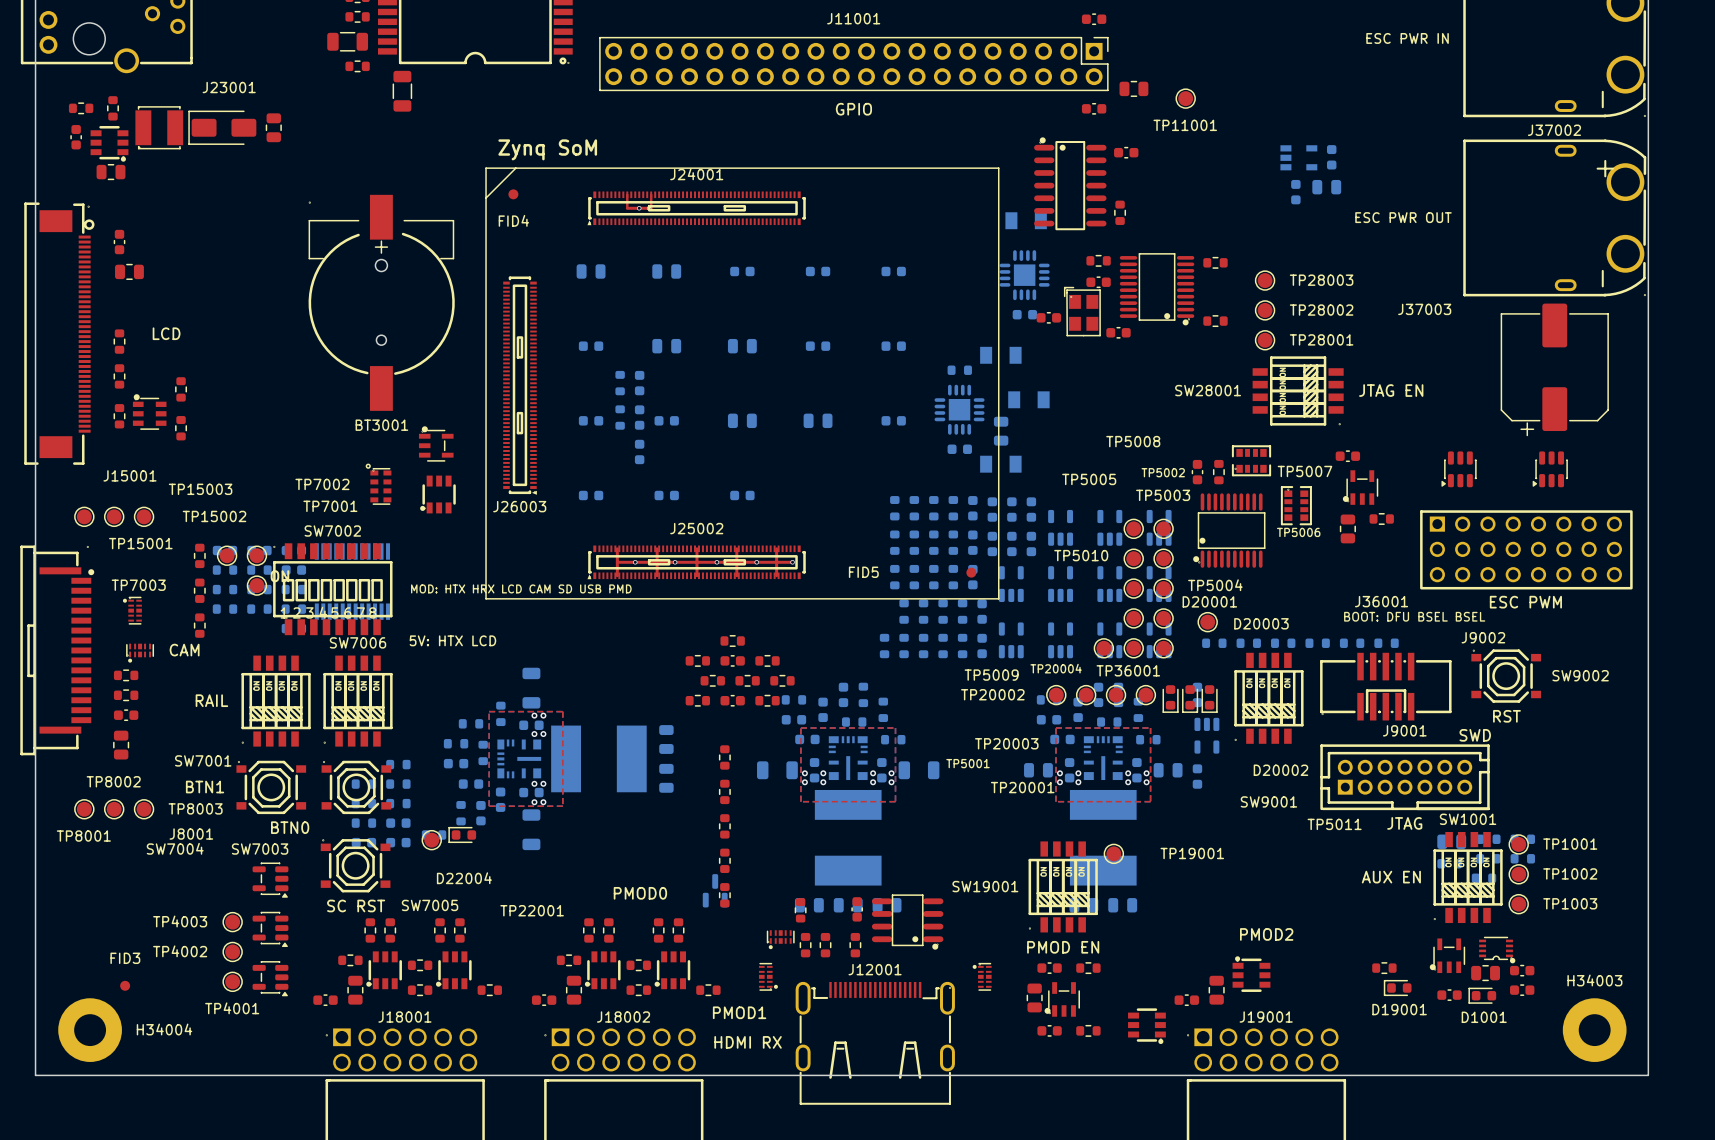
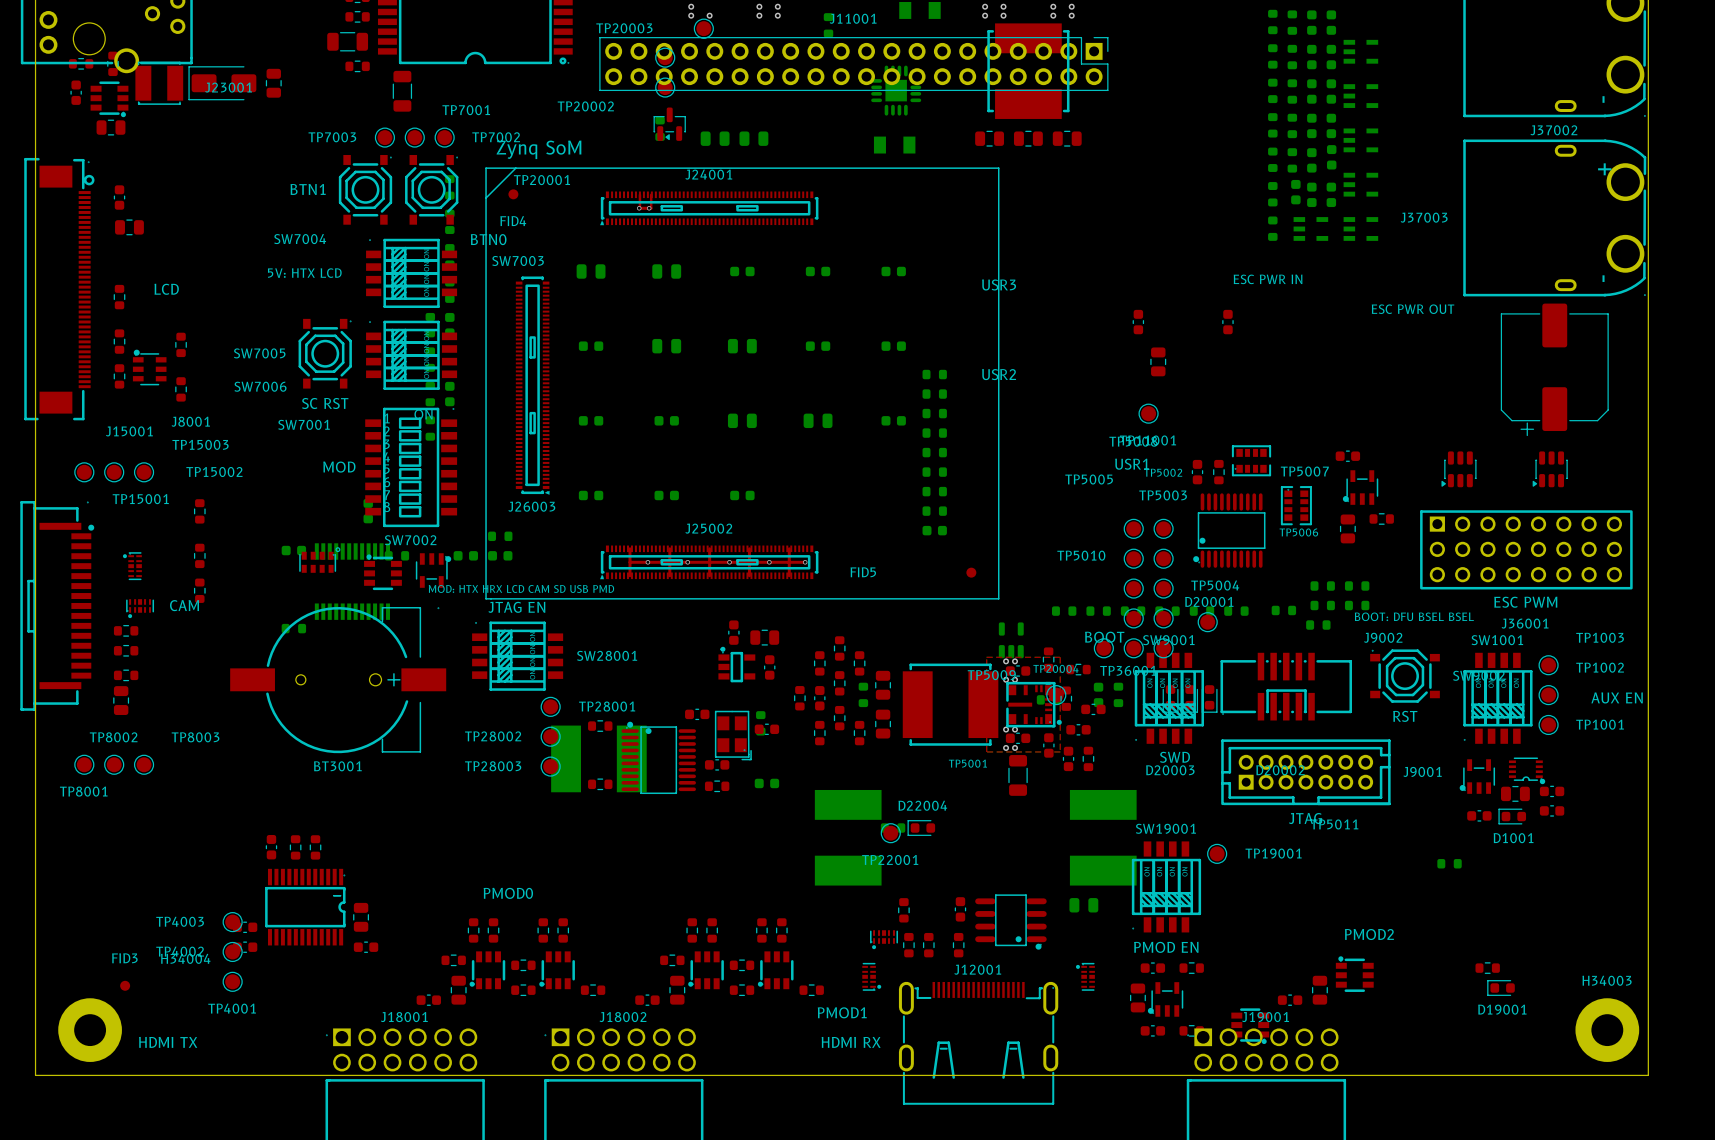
via: none -> (691, 6)
via: none -> (759, 6)
via: none -> (777, 6)
via: none -> (985, 6)
via: none -> (1003, 6)
via: none -> (1053, 6)
via: none -> (1071, 6)
part: none -> (919, 10)
via: none -> (691, 15)
via: none -> (709, 15)
via: none -> (759, 15)
via: none -> (777, 15)
via: none -> (985, 15)
via: none -> (1003, 15)
via: none -> (1053, 15)
via: none -> (1071, 15)
part: (1094, 19) -> none
part: none -> (1272, 22)
part: none -> (1292, 22)
part: none -> (1311, 22)
part: none -> (1331, 22)
part: none -> (828, 25)
text: ESC PWR IN (1407, 38) -> none
part: none -> (1360, 51)
part: none -> (1272, 56)
part: none -> (1292, 57)
part: none -> (1311, 57)
part: none -> (1331, 57)
part: none -> (81, 63)
part: none -> (112, 63)
part: none -> (1028, 71)
part: (1133, 88) -> none
part: none -> (896, 90)
part: none -> (1272, 90)
part: none -> (1292, 91)
part: none -> (1311, 91)
part: none -> (1331, 91)
part: none -> (76, 92)
part: none -> (1360, 96)
TP11001 position: (1185, 98) -> (1148, 413)
part: (81, 108) -> none
part: (112, 108) -> none
part: (1094, 108) -> none
text: GPIO (853, 109) -> none
part: none -> (669, 124)
part: none -> (1272, 125)
part: none -> (1292, 125)
part: none -> (1311, 125)
part: none -> (1331, 125)
part: none -> (110, 127)
part position: (159, 127) -> (159, 83)
part position: (222, 127) -> (222, 83)
part position: (273, 127) -> (273, 83)
part: none -> (660, 128)
part: (76, 137) -> none
part: none -> (715, 138)
part: none -> (753, 138)
part: none -> (989, 138)
part: none -> (1028, 138)
part: none -> (1067, 138)
part: none -> (1360, 140)
part position: (109, 143) -> (109, 99)
part: none -> (894, 145)
part: (1126, 152) -> none
part: (1298, 157) -> none
part: none -> (1272, 159)
part: none -> (1292, 160)
part: none -> (1311, 160)
part: (110, 172) -> none
part: (1070, 183) -> none
part: none -> (1360, 184)
part: none -> (449, 187)
part: (1326, 187) -> none
text: none -> BTN1 (308, 189)
top track: (627, 194) (627, 208) (639, 208) -> (639, 194) (639, 208)
part: none -> (1272, 194)
part: none -> (1311, 194)
part: none -> (1331, 194)
part: none -> (119, 197)
J24001 position: (696, 208) -> (709, 208)
part: (1120, 212) -> none
text position: ESC PWR OUT (1403, 217) -> ESC PWR OUT (1413, 309)
part: (1026, 220) -> none
part: none -> (449, 221)
part: none -> (129, 227)
part: none -> (1272, 228)
part: none -> (1310, 228)
part: none -> (1360, 228)
text: none -> BTN0 (488, 239)
part: (119, 242) -> none
part: none -> (449, 256)
part: (1098, 260) -> none
part: (1215, 262) -> none
part: (129, 271) -> none
text: none -> 5V: HTX LCD (304, 273)
part: (1024, 275) -> none
text: none -> ESC PWR IN (1268, 279)
TP28003 position: (1265, 280) -> (550, 766)
TP28003 name position: TP28003 (1321, 280) -> TP28003 (493, 766)
part: (1098, 282) -> none
text: none -> USR3 (999, 284)
part: (1157, 289) -> none
part: none -> (449, 290)
part: none -> (119, 297)
BT3001 rotation: 0° (381, 302) -> 90° clockwise (338, 680)
BT3001 position: (381, 302) -> (338, 680)
J37003 name position: J37003 (1424, 309) -> J37003 (1424, 217)
TP28002 position: (1265, 310) -> (550, 736)
TP28002 name position: TP28002 (1321, 310) -> TP28002 (493, 736)
part: (1082, 311) -> none
part: (1024, 314) -> none
part: (1048, 317) -> none
part: (1215, 321) -> none
part: none -> (1227, 322)
part: none -> (430, 325)
part: none -> (449, 325)
part rotation: 0° (1118, 332) -> 90° clockwise (1138, 322)
part position: (1118, 332) -> (1138, 322)
J15001 position: (59, 333) -> (59, 289)
text position: LCD (166, 333) -> LCD (166, 289)
TP28001 position: (1265, 340) -> (550, 706)
part: none -> (181, 344)
part: (1000, 355) -> none
part: none -> (430, 359)
part: none -> (1158, 361)
part: (959, 370) -> none
part: none -> (934, 374)
text: none -> USR2 (999, 374)
part: (620, 383) -> none
part: (639, 383) -> none
J26003 position: (520, 385) -> (532, 385)
SW28001 rotation: 0° (1298, 390) -> 180° (517, 656)
SW28001 position: (1298, 390) -> (517, 656)
text: JTAG EN (1391, 390) -> none
part: none -> (430, 394)
part: none -> (449, 394)
part: none -> (934, 394)
part: (1028, 399) -> none
text: none -> SC RST (325, 403)
part: (959, 409) -> none
part position: (149, 412) -> (149, 367)
part: none -> (934, 413)
part: (119, 416) -> none
part: (620, 417) -> none
part: (639, 417) -> none
BT3001 name position: BT3001 (381, 425) -> BT3001 (337, 766)
part: (181, 428) -> none
part: none -> (430, 428)
part: (1001, 431) -> none
part: none -> (934, 433)
part rotation: 0° (436, 443) -> 90° clockwise (433, 570)
part position: (436, 443) -> (433, 570)
part: (959, 449) -> none
part: (639, 451) -> none
part: none -> (934, 452)
part: (1000, 464) -> none
text: none -> USR1 (1132, 464)
text: none -> MOD (339, 467)
part: none -> (934, 472)
TP7002 name position: TP7002 (322, 484) -> TP7002 (496, 137)
part rotation: 0° (378, 484) -> 90° clockwise (319, 560)
part position: (378, 484) -> (319, 560)
part: none -> (934, 491)
part rotation: 0° (437, 494) -> 90° clockwise (382, 572)
part position: (437, 494) -> (382, 572)
TP7001 name position: TP7001 (330, 506) -> TP7001 (466, 110)
part: (894, 508) -> none
part: (914, 508) -> none
part rotation: 0° (933, 508) -> 90° clockwise (934, 511)
part: (953, 508) -> none
part: (972, 508) -> none
part: (992, 509) -> none
part: (1011, 509) -> none
part: (1031, 509) -> none
part: none -> (199, 511)
part: none -> (368, 511)
TP15001 position: (84, 516) -> (84, 472)
TP15002 position: (114, 516) -> (114, 472)
TP15003 position: (144, 516) -> (144, 472)
part: (1060, 527) -> none
part: (1109, 527) -> none
part: (1159, 527) -> none
part: none -> (934, 530)
SW7002 name position: SW7002 (332, 531) -> SW7002 (410, 540)
part: none -> (500, 536)
part: (894, 542) -> none
part: (914, 542) -> none
part: (933, 542) -> none
part: (953, 542) -> none
part: (972, 542) -> none
part: (992, 543) -> none
part: (1011, 543) -> none
part: (1031, 543) -> none
top track: (617, 548) (617, 575) -> (629, 548) (629, 575)
top track: (657, 548) (657, 575) -> (669, 548) (669, 575)
top track: (696, 548) (696, 575) -> (709, 548) (709, 575)
top track: (736, 548) (736, 575) -> (749, 548) (749, 575)
top track: (776, 548) (776, 575) -> (789, 548) (789, 575)
part: (224, 550) -> none
part: (259, 550) -> none
TP7002 position: (227, 555) -> (444, 137)
TP7001 position: (256, 555) -> (414, 137)
part: none -> (396, 555)
part: none -> (465, 555)
part: none -> (500, 555)
top track: (617, 562) (629, 562) -> (792, 562) (805, 562)
via position: (635, 562) -> (647, 562)
via position: (675, 562) -> (687, 562)
J25002 position: (696, 562) -> (709, 562)
via position: (716, 562) -> (729, 562)
via: (756, 562) -> none
via: none -> (769, 562)
via: (792, 562) -> none
via: none -> (805, 562)
part: (224, 570) -> none
part: (259, 570) -> none
part: (293, 570) -> none
part: (894, 577) -> none
part: (914, 577) -> none
part: (933, 577) -> none
part: (953, 577) -> none
part: (972, 577) -> none
part: (1011, 584) -> none
part: (1060, 584) -> none
part: (1109, 584) -> none
part: (1159, 584) -> none
TP7003 name position: TP7003 (138, 585) -> TP7003 (332, 137)
TP7003 position: (256, 585) -> (384, 137)
part: none -> (1322, 585)
part: none -> (1357, 585)
part: (224, 589) -> none
part: (259, 589) -> none
part: (293, 589) -> none
SW7002 rotation: 0° (332, 589) -> 90° clockwise (411, 467)
SW7002 position: (332, 589) -> (411, 467)
J36001 name position: J36001 (1381, 601) -> J36001 (1525, 623)
part: none -> (1322, 605)
part: none -> (1357, 605)
text: none -> JTAG EN (516, 607)
part: (224, 609) -> none
part: (259, 609) -> none
part: (293, 609) -> none
part rotation: 0° (132, 610) -> 90° counterclockwise (140, 608)
part: none -> (1283, 610)
part: (904, 611) -> none
part: (923, 611) -> none
part: (943, 611) -> none
part: (962, 611) -> none
part: (982, 611) -> none
part: none -> (1064, 611)
part: none -> (1098, 611)
part: none -> (1133, 611)
part: none -> (1167, 611)
part: none -> (1201, 611)
part: none -> (1236, 611)
D20003 name position: D20003 (1261, 623) -> D20003 (1170, 770)
part: (199, 625) -> none
part: none -> (126, 630)
part footprint: [720, 635, 745, 647] -> [728, 620, 740, 645]
part: none -> (764, 637)
text: none -> BOOT (1104, 637)
text: 5V: HTX LCD (452, 640) -> none
part: (1060, 640) -> none
part: (1109, 640) -> none
part: (1159, 640) -> none
SW7006 name position: SW7006 (357, 642) -> SW7006 (260, 386)
part: (1214, 643) -> none
part: (1248, 643) -> none
part: (1283, 643) -> none
part position: (1317, 643) -> (1318, 625)
part: (1352, 643) -> none
part: (1386, 643) -> none
part: (884, 646) -> none
part: (904, 646) -> none
part: (923, 646) -> none
part: (943, 646) -> none
part: (962, 646) -> none
part: (982, 646) -> none
part: none -> (839, 648)
J8001 position: (57, 650) -> (57, 605)
part: none -> (126, 650)
text position: CAM (184, 650) -> CAM (184, 605)
part rotation: 0° (140, 653) -> 90° clockwise (132, 566)
part position: (140, 653) -> (132, 566)
part footprint: [720, 655, 745, 667] -> [718, 646, 756, 683]
part footprint: [755, 655, 780, 667] -> [764, 655, 776, 680]
top zone outline: none -> (986, 657) (986, 751) (1060, 751) (1060, 657) (986, 657)
part: none -> (1048, 659)
part: (697, 660) -> none
via: none -> (1006, 661)
via: none -> (1015, 661)
part: none -> (819, 663)
part: none -> (859, 663)
part: none -> (1078, 669)
part: none -> (1018, 671)
SW9002 position: (1506, 676) -> (1405, 676)
via: none -> (1006, 679)
via: none -> (1015, 679)
part: (712, 680) -> none
part: (747, 680) -> none
part: (782, 680) -> none
part: none -> (839, 683)
J9002 position: (1385, 686) -> (1286, 686)
part: (531, 688) -> none
part footprint: [113, 689, 139, 702] -> [113, 686, 130, 715]
part: (843, 694) -> none
TP20002 name position: TP20002 (992, 694) -> TP20002 (585, 106)
part: (1197, 694) -> none
TP20003 position: (1086, 695) -> (703, 28)
TP20002 position: (1116, 695) -> (665, 57)
TP20001 position: (1145, 695) -> (665, 87)
text: none -> AUX EN (1617, 697)
part: none -> (819, 698)
part: none -> (1066, 698)
SW9001 position: (1268, 698) -> (1169, 698)
part side: bottom (793, 699) -> top (799, 698)
text: RAIL (211, 700) -> none
part: (697, 700) -> none
part: (732, 700) -> none
part: (767, 700) -> none
SW7001 rotation: 0° (276, 701) -> 90° clockwise (411, 355)
SW7001 position: (276, 701) -> (411, 355)
SW7006 rotation: 0° (357, 701) -> 90° clockwise (411, 273)
SW7006 position: (357, 701) -> (411, 273)
part: none -> (950, 704)
part: none -> (1033, 704)
part: (823, 709) -> none
part: (883, 709) -> none
part: (1078, 709) -> none
part: none -> (1093, 709)
part: (1138, 709) -> none
top zone outline: (489, 711) (562, 711) (562, 806) (489, 806) (489, 711) -> none
part: (500, 713) -> none
part: none -> (697, 714)
part: (126, 715) -> none
via: (534, 715) -> none
via: (543, 715) -> none
text position: RST (1506, 716) -> RST (1405, 716)
part: none -> (839, 718)
part: (793, 719) -> none
part: (1049, 719) -> none
part: (854, 722) -> none
part: (1109, 722) -> none
part: (470, 723) -> none
part: none -> (760, 723)
part: (531, 725) -> none
part: none -> (600, 726)
top zone outline: (800, 728) (800, 801) (895, 801) (895, 728) (800, 728) -> none
top zone outline: (1055, 728) (1150, 728) (1150, 801) (1055, 801) (1055, 728) -> none
part: none -> (766, 729)
via: none -> (1006, 729)
via: none -> (1015, 729)
part: none -> (1078, 729)
J9001 name position: J9001 (1404, 730) -> J9001 (1422, 771)
part: none -> (819, 733)
part: none -> (859, 733)
via: (534, 734) -> none
via: (543, 734) -> none
part: none -> (733, 735)
part: (1206, 735) -> none
text: SWD (1475, 735) -> none
part: none -> (1018, 738)
part side: bottom (666, 739) -> top (883, 685)
part: (807, 739) -> none
part: (893, 739) -> none
part: (1062, 739) -> none
part: (1148, 739) -> none
part: (456, 743) -> none
TP20003 name position: TP20003 (1006, 743) -> TP20003 (624, 28)
part: (121, 745) -> none
part: none -> (1048, 745)
via: none -> (1006, 747)
via: none -> (1015, 747)
part: (483, 752) -> none
part: none -> (658, 757)
part: (724, 757) -> none
text: none -> SWD (1175, 757)
part: (519, 758) -> none
part: (848, 758) -> none
part: none -> (1068, 758)
part: none -> (1088, 758)
part: (1103, 758) -> none
SW7001 name position: SW7001 (203, 760) -> SW7001 (304, 424)
part: (456, 763) -> none
part: (398, 764) -> none
part: none -> (717, 764)
part: (777, 770) -> none
part: (814, 770) -> none
part: (881, 770) -> none
part: (918, 770) -> none
part: (1038, 770) -> none
part: (1069, 770) -> none
part: (1136, 770) -> none
part: (1168, 770) -> none
via: (804, 773) -> none
via: (823, 773) -> none
via: (873, 773) -> none
via: (891, 773) -> none
via: (1059, 773) -> none
via: (1078, 773) -> none
via: (1128, 773) -> none
via: (1146, 773) -> none
part: none -> (1018, 775)
part: (1197, 776) -> none
part: none -> (1477, 776)
J9001 position: (1405, 777) -> (1305, 772)
part side: bottom (666, 778) -> top (883, 724)
via: (804, 782) -> none
via: (823, 782) -> none
via: (873, 782) -> none
via: (891, 782) -> none
via: (1059, 782) -> none
via: (1078, 782) -> none
via: (1128, 782) -> none
via: (1146, 782) -> none
via: (534, 783) -> none
via: (543, 783) -> none
part: none -> (766, 783)
part: (363, 784) -> none
part: (398, 784) -> none
part: (470, 784) -> none
part: none -> (600, 784)
text: BTN1 (205, 787) -> none
SW7004 rotation: 0° (271, 787) -> 90° clockwise (365, 189)
SW7004 position: (271, 787) -> (365, 189)
SW7003 rotation: 0° (356, 787) -> 90° clockwise (431, 189)
SW7003 position: (356, 787) -> (431, 189)
part rotation: 0° (724, 791) -> 90° clockwise (717, 786)
part: none -> (1552, 791)
part: (531, 792) -> none
part: none -> (1515, 793)
part: (500, 799) -> none
SW9001 name position: SW9001 (1268, 801) -> SW9001 (1168, 640)
via: (534, 802) -> none
via: (543, 802) -> none
part: (363, 803) -> none
part: (398, 803) -> none
TP8003 name position: TP8003 (195, 808) -> TP8003 (195, 737)
TP8001 position: (84, 809) -> (84, 764)
TP8002 position: (114, 809) -> (114, 764)
TP8003 position: (144, 809) -> (144, 764)
part: none -> (1552, 810)
part: (461, 813) -> none
part: (480, 813) -> none
part: none -> (1479, 815)
part: (363, 823) -> none
part: (398, 823) -> none
text position: JTAG (1404, 823) -> JTAG (1305, 818)
part: (724, 826) -> none
text: BTN0 (290, 827) -> none
part: none -> (893, 828)
part: (531, 829) -> none
J8001 name position: J8001 (191, 834) -> J8001 (190, 421)
part: (434, 834) -> none
D22004 position: (462, 834) -> (921, 828)
part: (1488, 839) -> none
part: (1522, 839) -> none
TP22001 position: (431, 840) -> (890, 833)
part: (1451, 841) -> none
part: (363, 842) -> none
part: (398, 842) -> none
TP1001 position: (1518, 844) -> (1548, 724)
part: none -> (271, 847)
part: none -> (295, 847)
part: none -> (315, 847)
SW7004 name position: SW7004 (175, 848) -> SW7004 (300, 239)
SW7003 name position: SW7003 (260, 849) -> SW7003 (518, 260)
TP19001 position: (1113, 853) -> (1217, 853)
TP19001 name position: TP19001 (1192, 853) -> TP19001 (1273, 853)
part: (1488, 858) -> none
part: (1522, 858) -> none
part: (724, 860) -> none
SW7005 rotation: 0° (355, 865) -> 90° clockwise (325, 353)
SW7005 position: (355, 865) -> (325, 353)
TP1002 name position: TP1002 (1570, 873) -> TP1002 (1600, 667)
TP1002 position: (1518, 874) -> (1548, 695)
text: AUX EN (1391, 877) -> none
SW1001 position: (1468, 877) -> (1497, 698)
D22004 name position: D22004 (464, 878) -> D22004 (922, 805)
part: (1483, 878) -> none
part: (270, 880) -> none
SW19001 name position: SW19001 (985, 886) -> SW19001 (1165, 828)
SW19001 position: (1063, 886) -> (1166, 886)
part: (715, 890) -> none
text position: PMOD0 (640, 893) -> PMOD0 (508, 893)
part: (724, 895) -> none
TP1003 name position: TP1003 (1570, 903) -> TP1003 (1600, 637)
TP1003 position: (1518, 904) -> (1548, 665)
text: SC RST (356, 905) -> none
SW7005 name position: SW7005 (430, 905) -> SW7005 (259, 353)
part: (809, 905) -> none
part: (848, 905) -> none
part: (887, 905) -> none
part: (1122, 905) -> none
part: none -> (305, 907)
part: (857, 909) -> none
part: none -> (960, 909)
TP22001 name position: TP22001 (532, 910) -> TP22001 (890, 860)
part: (800, 910) -> none
part: none -> (903, 910)
part: none -> (361, 917)
part position: (907, 922) -> (1010, 922)
part: none -> (245, 927)
part: (270, 929) -> none
part: (370, 930) -> none
part: (390, 930) -> none
part: (440, 930) -> none
part position: (459, 930) -> (473, 930)
part: none -> (493, 930)
part: none -> (543, 930)
part: none -> (563, 930)
part: (588, 930) -> none
part: (608, 930) -> none
part: (658, 930) -> none
part position: (678, 930) -> (692, 930)
part: none -> (712, 930)
part: none -> (761, 930)
part footprint: [766, 930, 795, 950] -> [776, 918, 788, 943]
text position: PMOD2 (1266, 934) -> PMOD2 (1369, 934)
part: none -> (884, 939)
part: (805, 945) -> none
part: (825, 945) -> none
part: (855, 945) -> none
part: none -> (908, 945)
part: none -> (928, 945)
part: none -> (958, 945)
part: none -> (245, 947)
part: none -> (366, 947)
text position: PMOD EN (1063, 947) -> PMOD EN (1166, 947)
part position: (1497, 950) -> (1527, 770)
part: (1447, 955) -> none
part: (350, 960) -> none
part: none -> (453, 960)
part: (569, 960) -> none
part: none -> (672, 960)
part footprint: [758, 962, 778, 991] -> [757, 951, 794, 990]
part footprint: [1076, 962, 1101, 974] -> [1075, 962, 1095, 991]
part: (420, 965) -> none
part: none -> (523, 965)
part: (638, 965) -> none
part: none -> (742, 965)
part footprint: [1471, 965, 1501, 982] -> [1475, 962, 1500, 974]
part: (1049, 968) -> none
part: none -> (1191, 968)
part: (1384, 968) -> none
part: (384, 970) -> none
part position: (453, 970) -> (487, 970)
part position: (602, 970) -> (557, 970)
part position: (672, 970) -> (706, 970)
part: (1522, 970) -> none
part: (1251, 974) -> none
part: none -> (1354, 974)
part: none -> (871, 976)
part: (982, 976) -> none
part: (270, 978) -> none
D19001 position: (1397, 988) -> (1501, 988)
part: (355, 990) -> none
part: (420, 990) -> none
part: none -> (458, 990)
part: (489, 990) -> none
part: none -> (523, 990)
part: (574, 990) -> none
part: none -> (593, 990)
part: (638, 990) -> none
part: none -> (677, 990)
part: (708, 990) -> none
part: none -> (742, 990)
part: none -> (811, 990)
part: (1216, 990) -> none
part: none -> (1319, 990)
part: (1522, 990) -> none
part: (1449, 995) -> none
D1001 position: (1482, 995) -> (1512, 816)
part: (1034, 997) -> none
part: none -> (1137, 997)
part position: (1062, 999) -> (1165, 999)
part: (325, 1000) -> none
part: none -> (428, 1000)
part: (544, 1000) -> none
part: none -> (647, 1000)
part position: (1186, 1000) -> (1152, 968)
part: none -> (1290, 1000)
part footprint: [1128, 1008, 1166, 1045] -> [1140, 1025, 1166, 1037]
text position: PMOD1 (739, 1012) -> PMOD1 (842, 1012)
part: none -> (1250, 1026)
H34004 name position: H34004 (164, 1029) -> H34004 (185, 958)
part: (1049, 1030) -> none
part: (1088, 1030) -> none
part: none -> (1191, 1030)
H34003 position: (1594, 1030) -> (1607, 1030)
text: none -> HDMI TX (168, 1042)
text position: HDMI RX (748, 1042) -> HDMI RX (851, 1042)
J12001 position: (875, 1043) -> (978, 1043)

